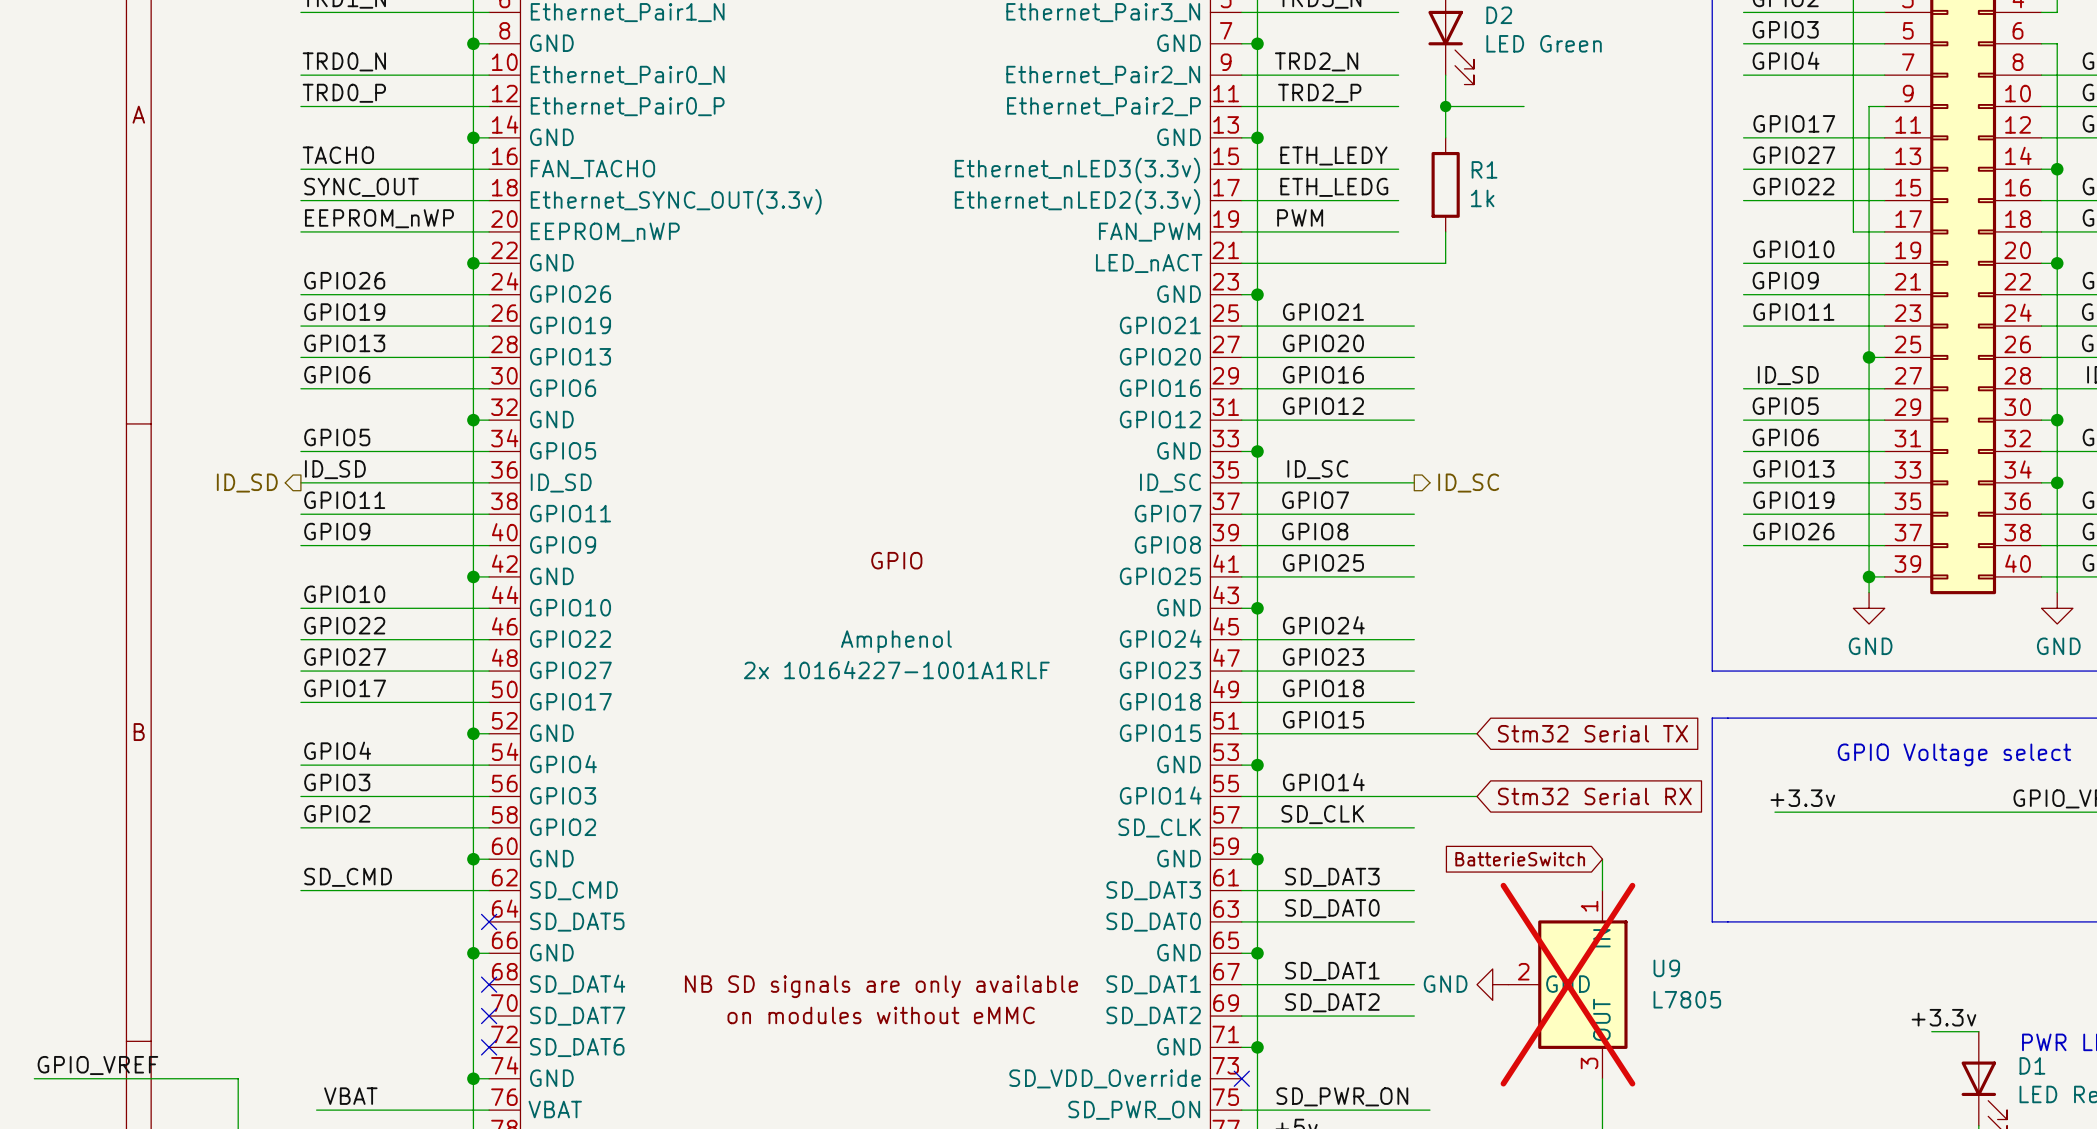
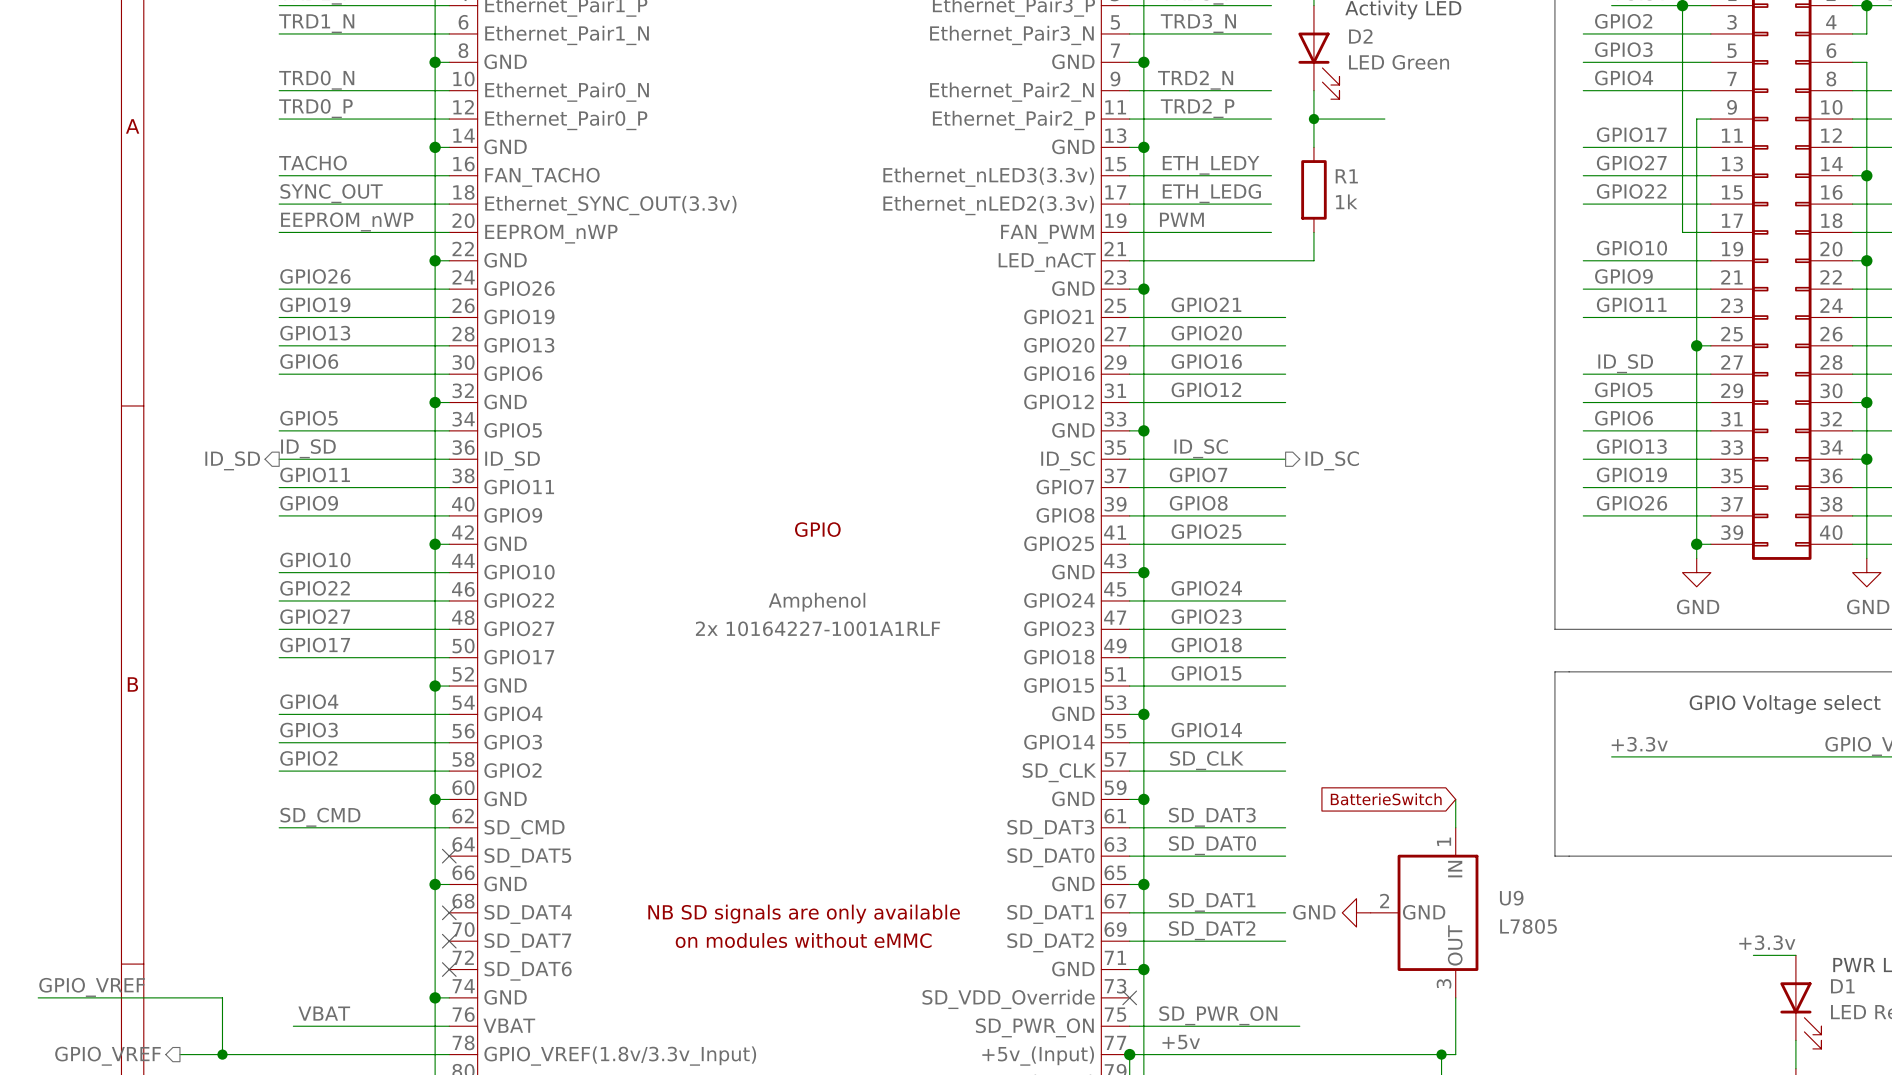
wire: (1414, 733) (1477, 733) -> none
global label: Stm32 Serial TX (1592, 733) -> none
wire: (1414, 796) (1477, 796) -> none
global label: Stm32 Serial RX (1594, 796) -> none
U9 do-not-place cross: (1567, 984) -> none

